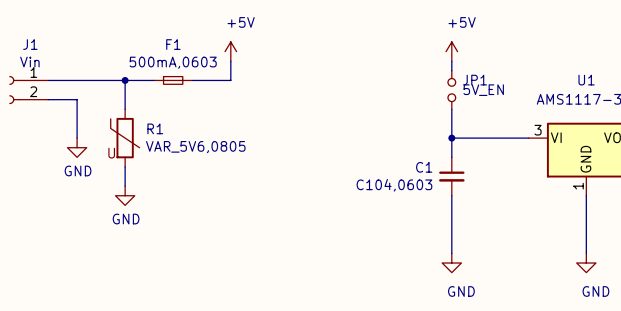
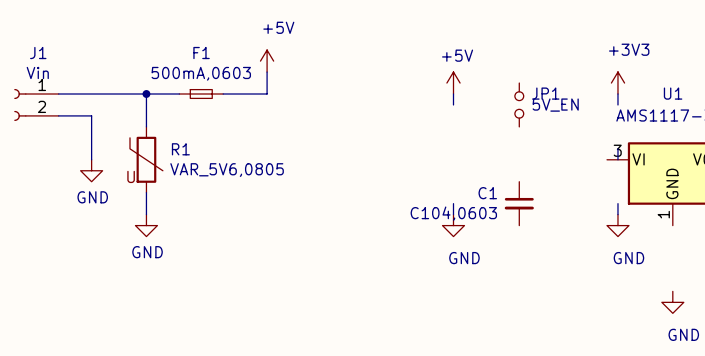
power symbol text position: +5V (462, 22) -> +5V (457, 55)
power symbol position: +5V (451, 51) -> +5V (453, 83)
wire: (451, 61) (451, 70) -> (453, 94) (453, 104)
power symbol: none -> +3V3 (617, 83)
wire: none -> (617, 94) (617, 104)
wire: (451, 109) (451, 157) -> none
wire: none -> (617, 148) (617, 159)
wire: (451, 138) (528, 138) -> none
junction: (451, 138) -> none
wire: none -> (453, 203) (453, 214)
wire: none -> (617, 203) (617, 214)
power symbol: none -> GND (453, 225)
wire: (451, 195) (451, 253) -> none
power symbol: none -> GND (617, 225)
wire: (586, 195) (586, 253) -> none
power symbol: GND (451, 263) -> none

